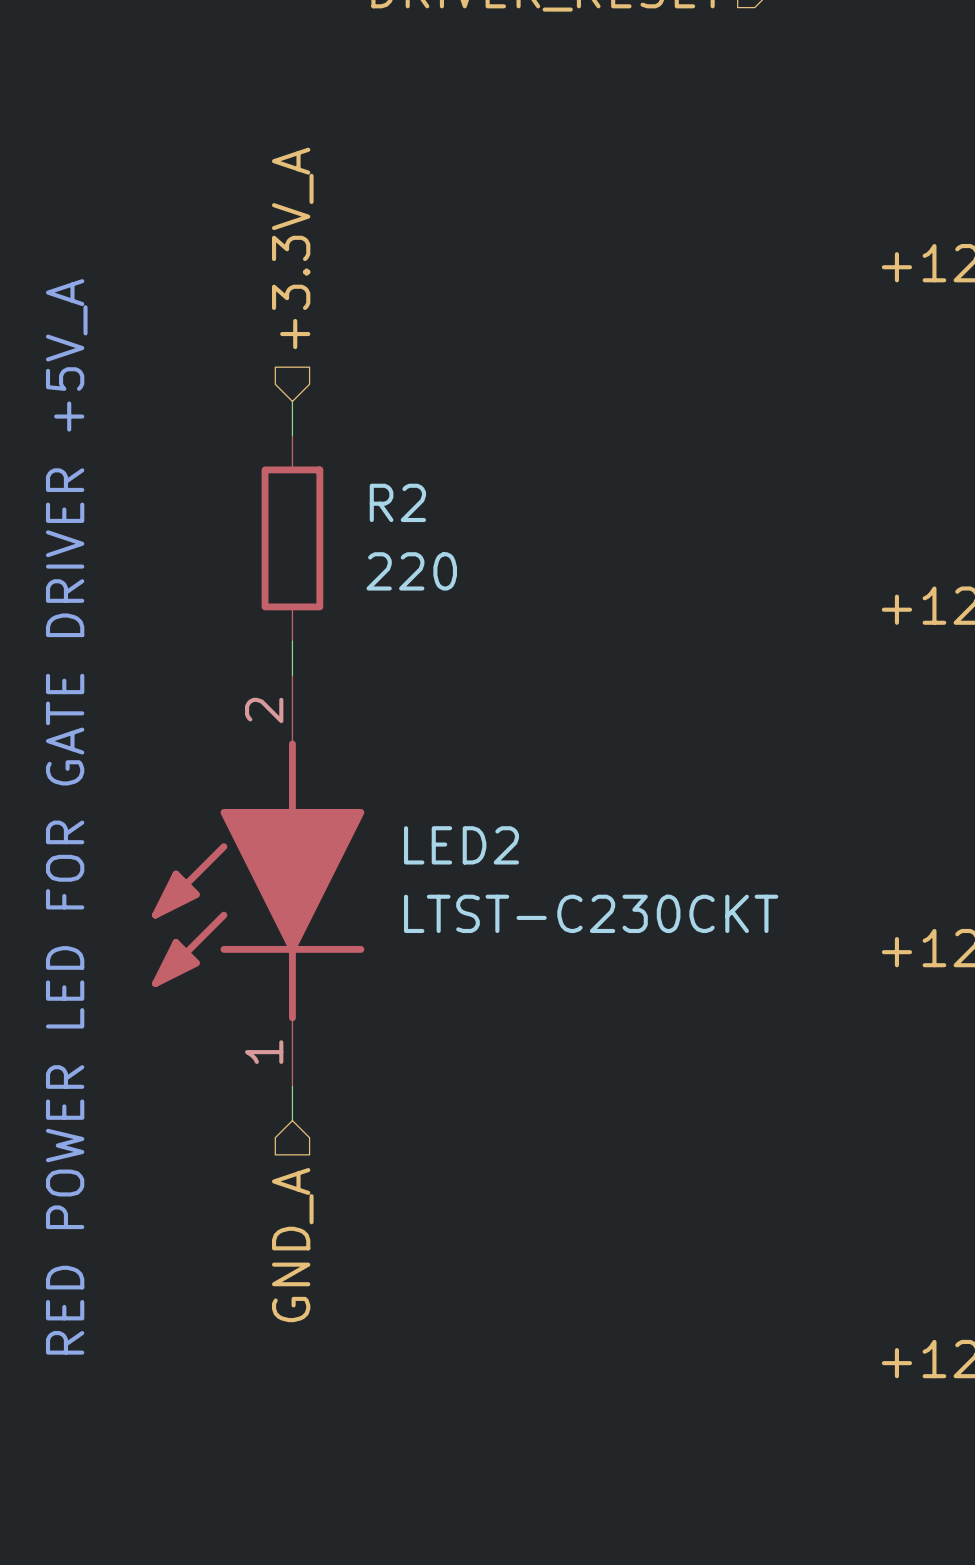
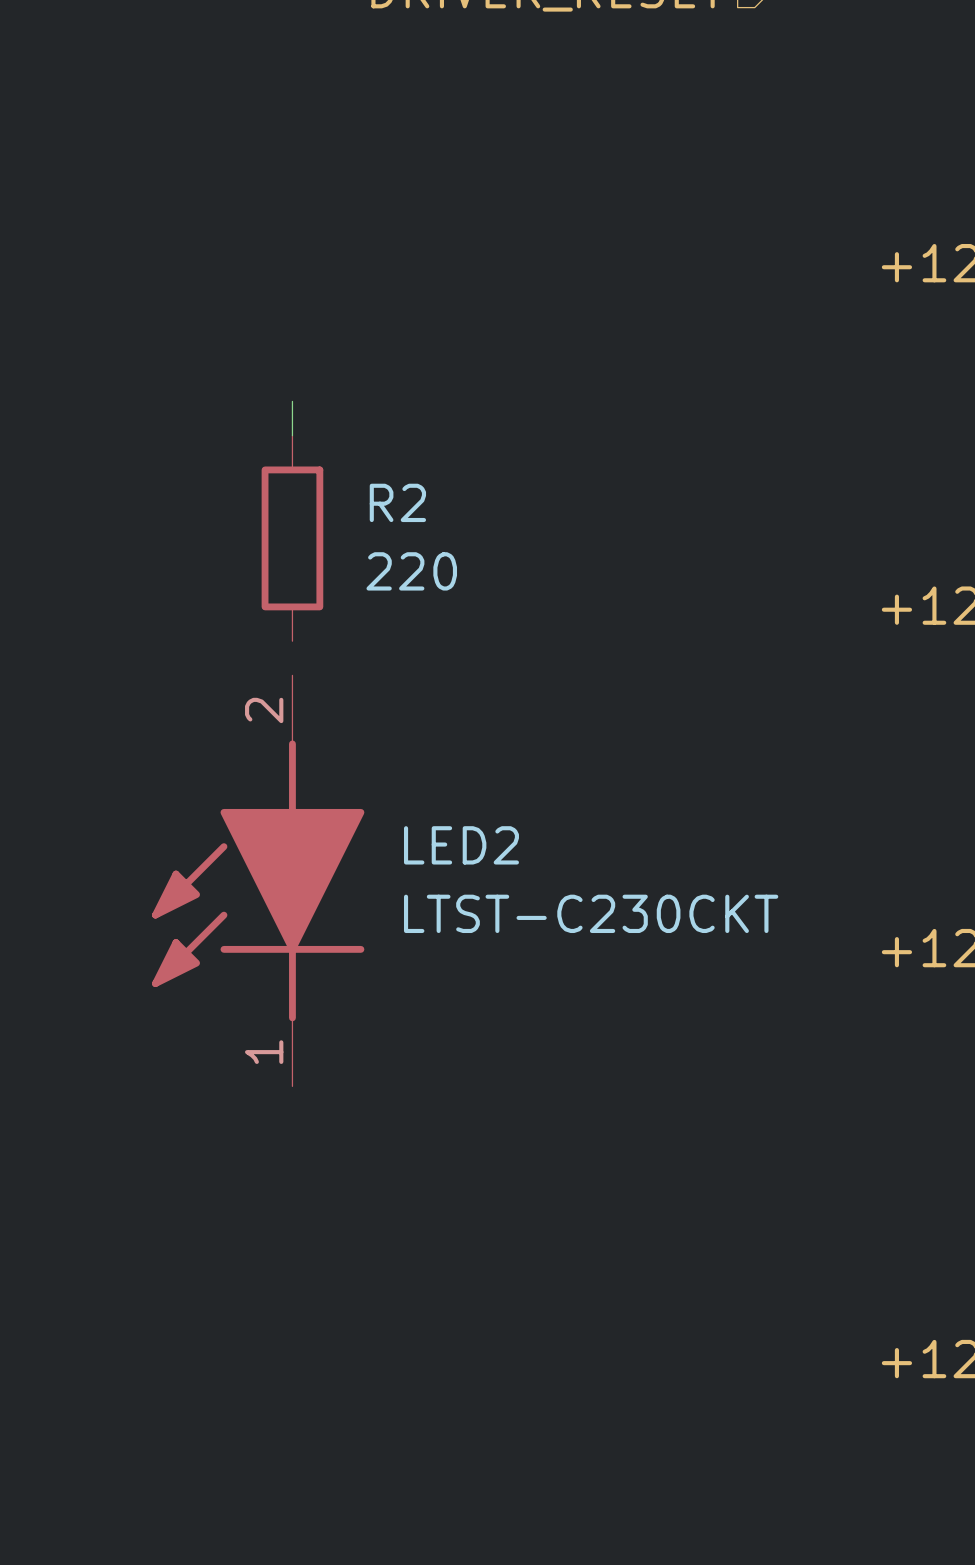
hierarchical label: +3.3V_A (292, 248) -> none
wire: (292, 641) (292, 675) -> none
text: RED POWER LED FOR GATE DRIVER +5V_A (66, 816) -> none
wire: (292, 1086) (292, 1120) -> none
hierarchical label: GND_A (292, 1245) -> none

